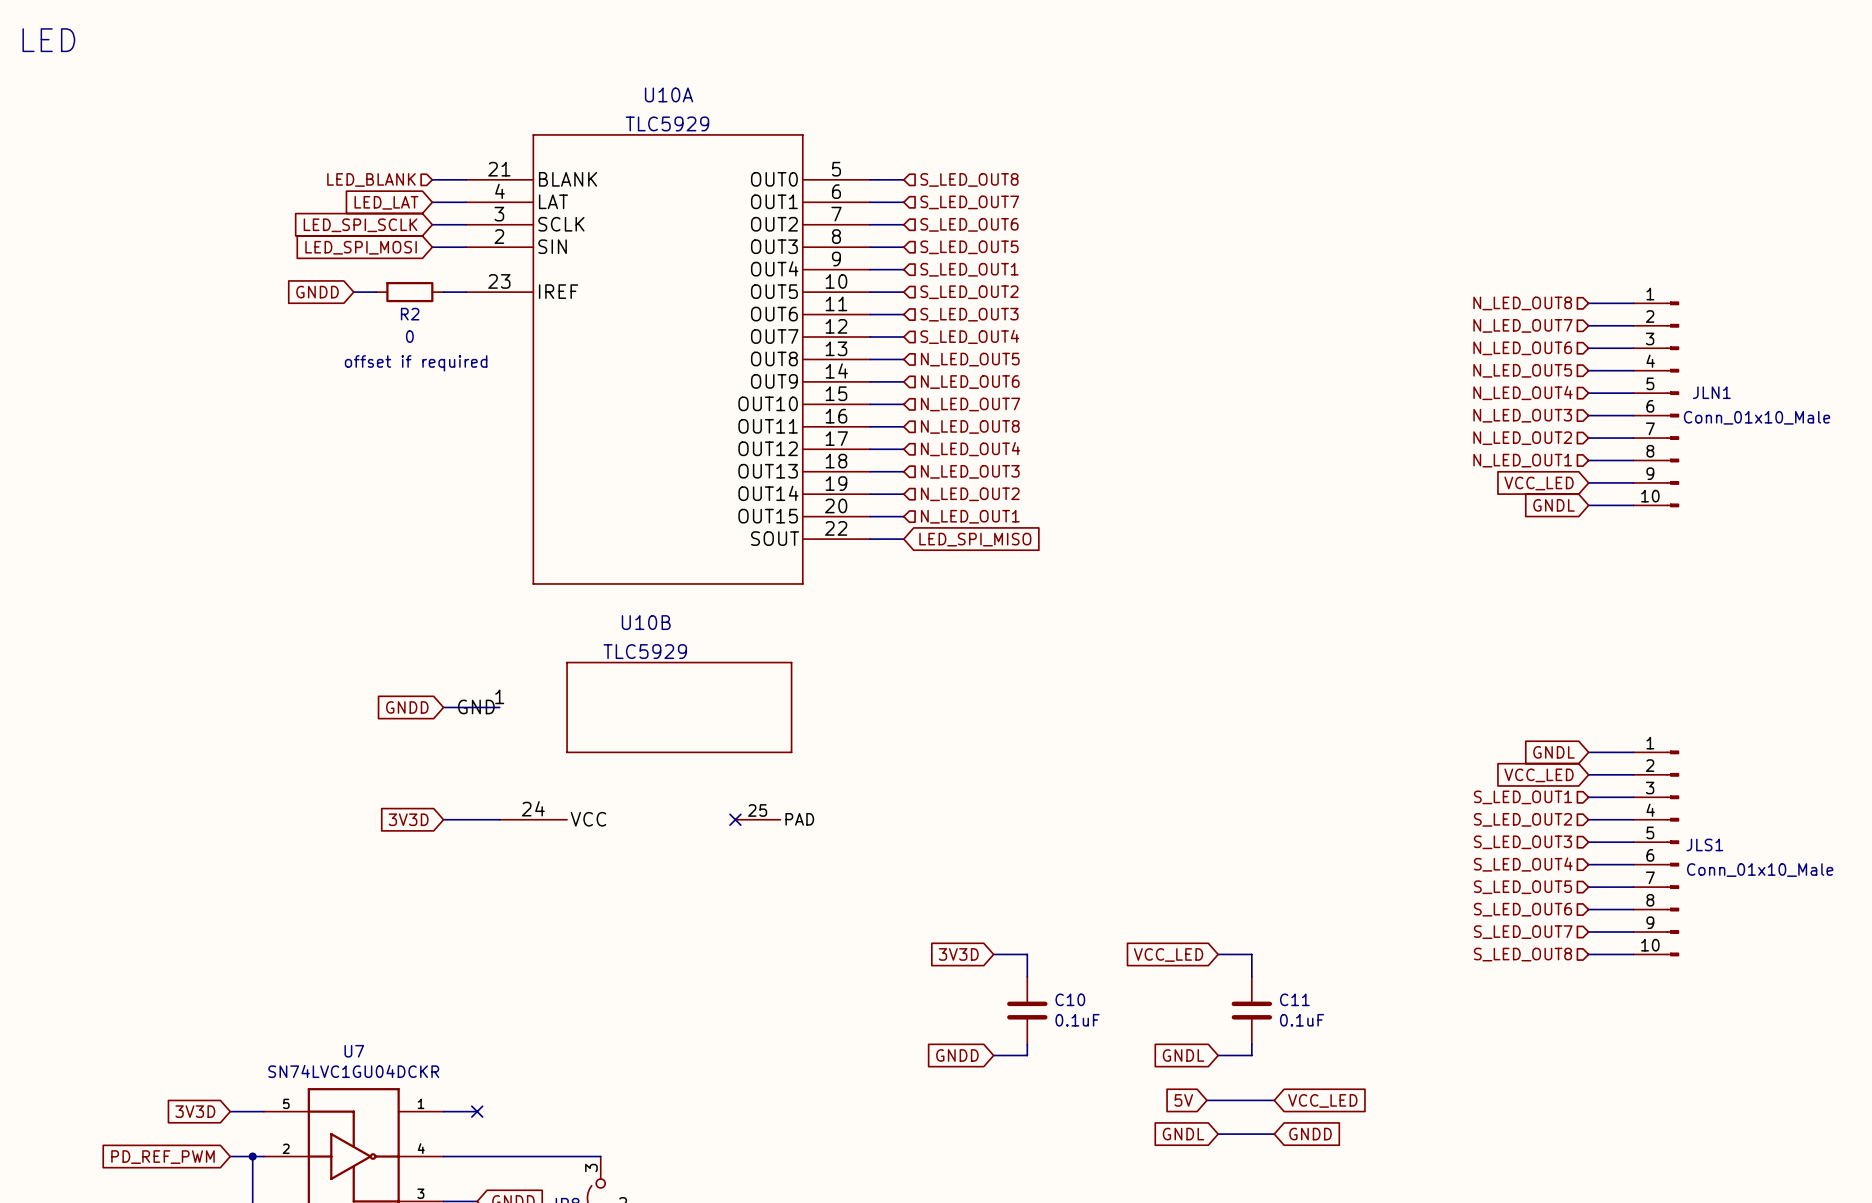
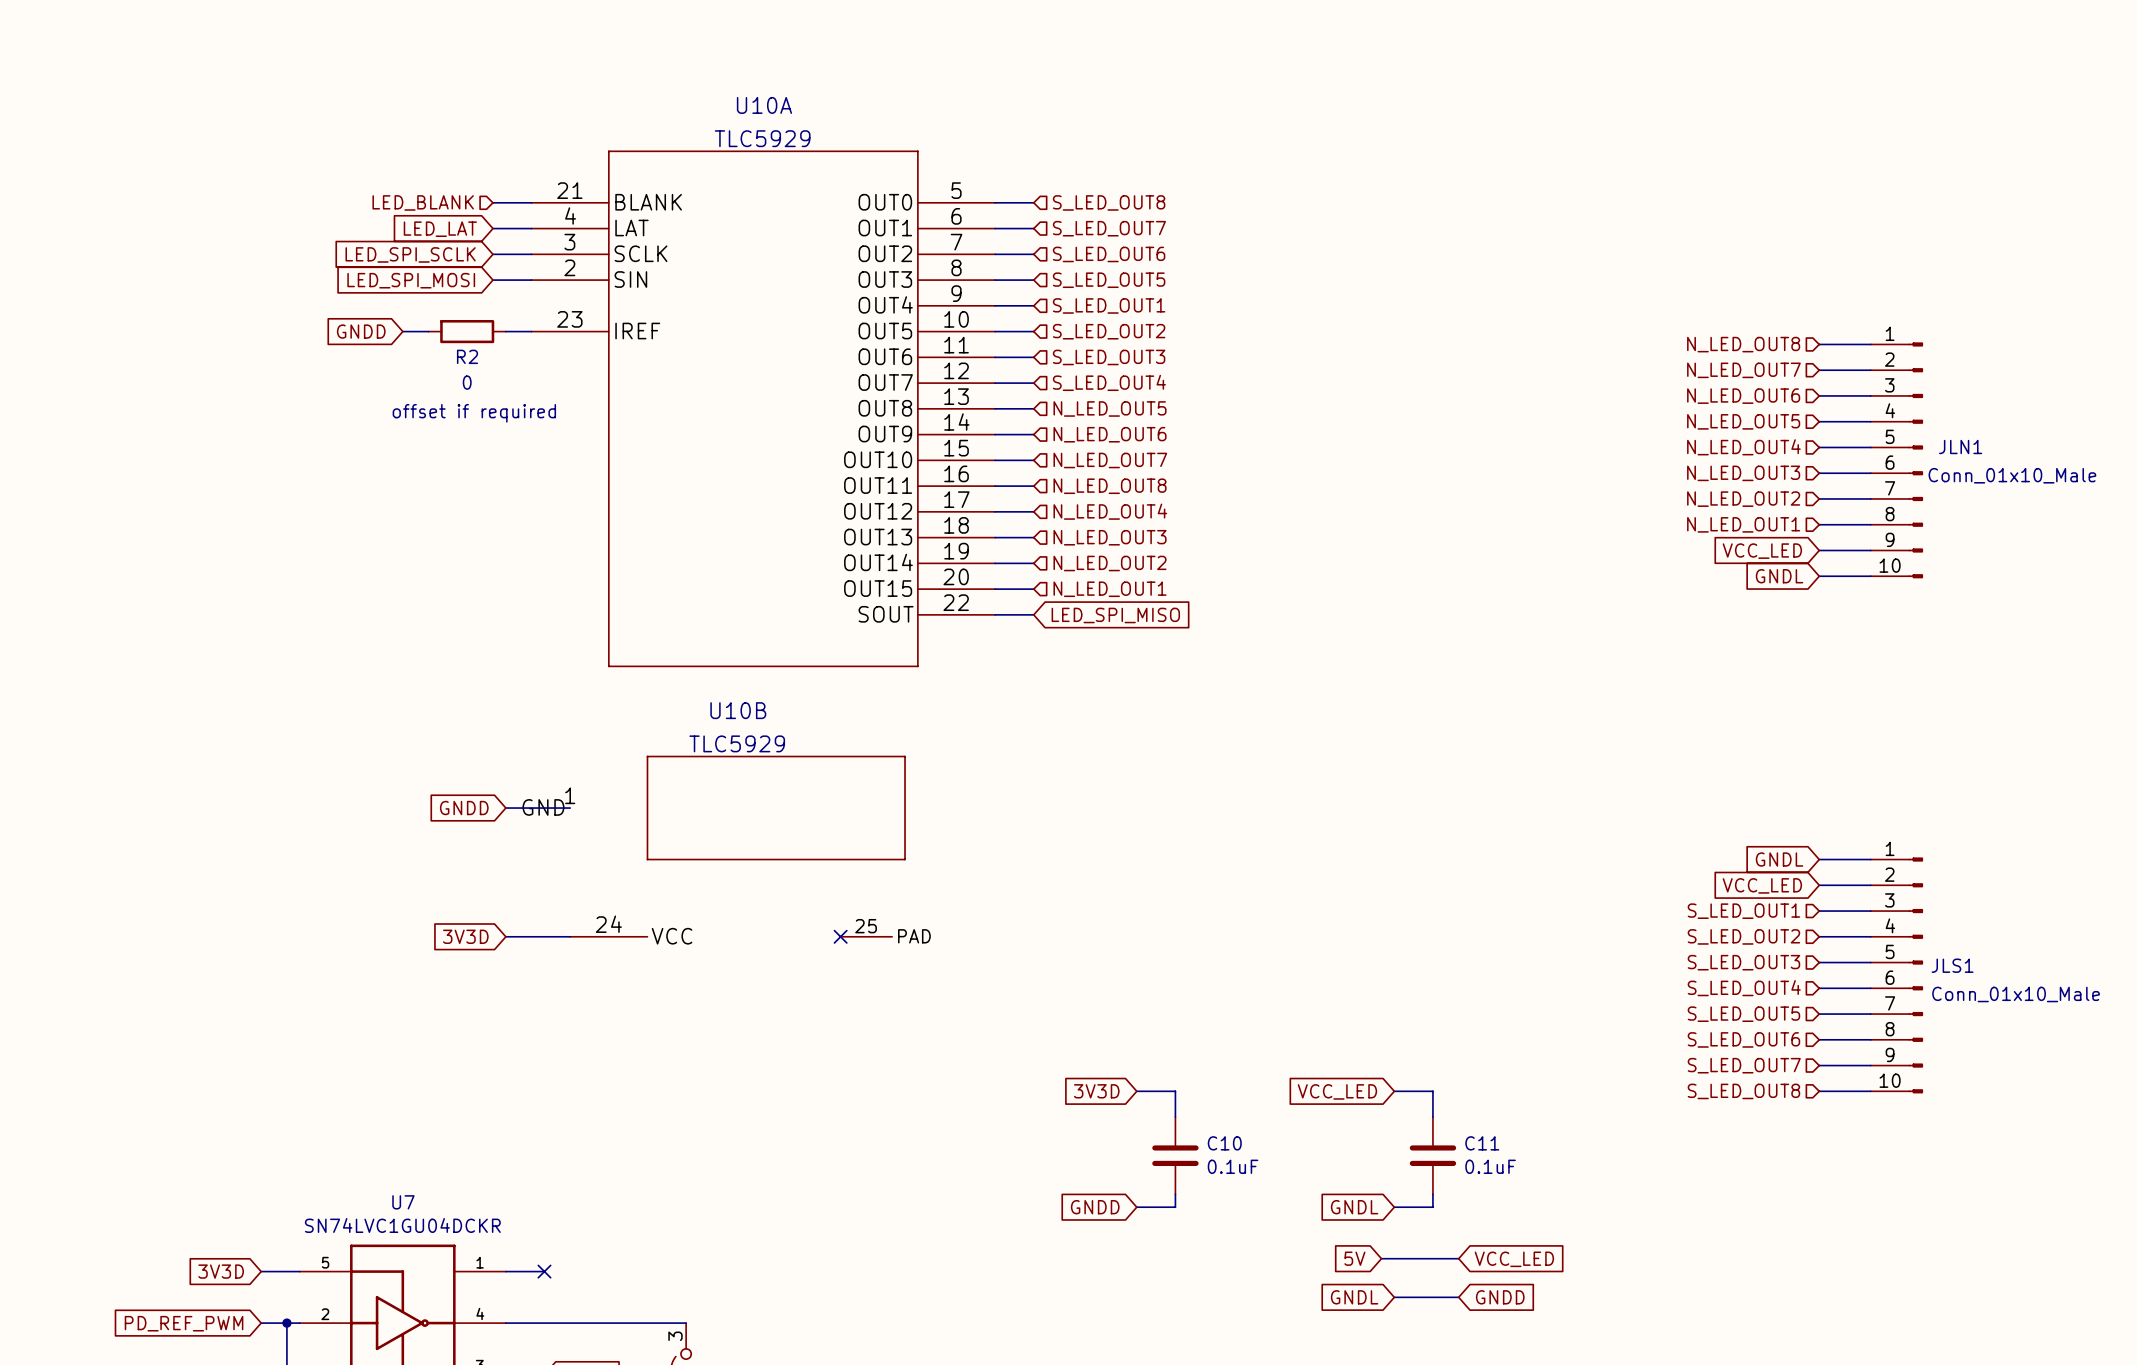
text: LED (48, 40) -> none

